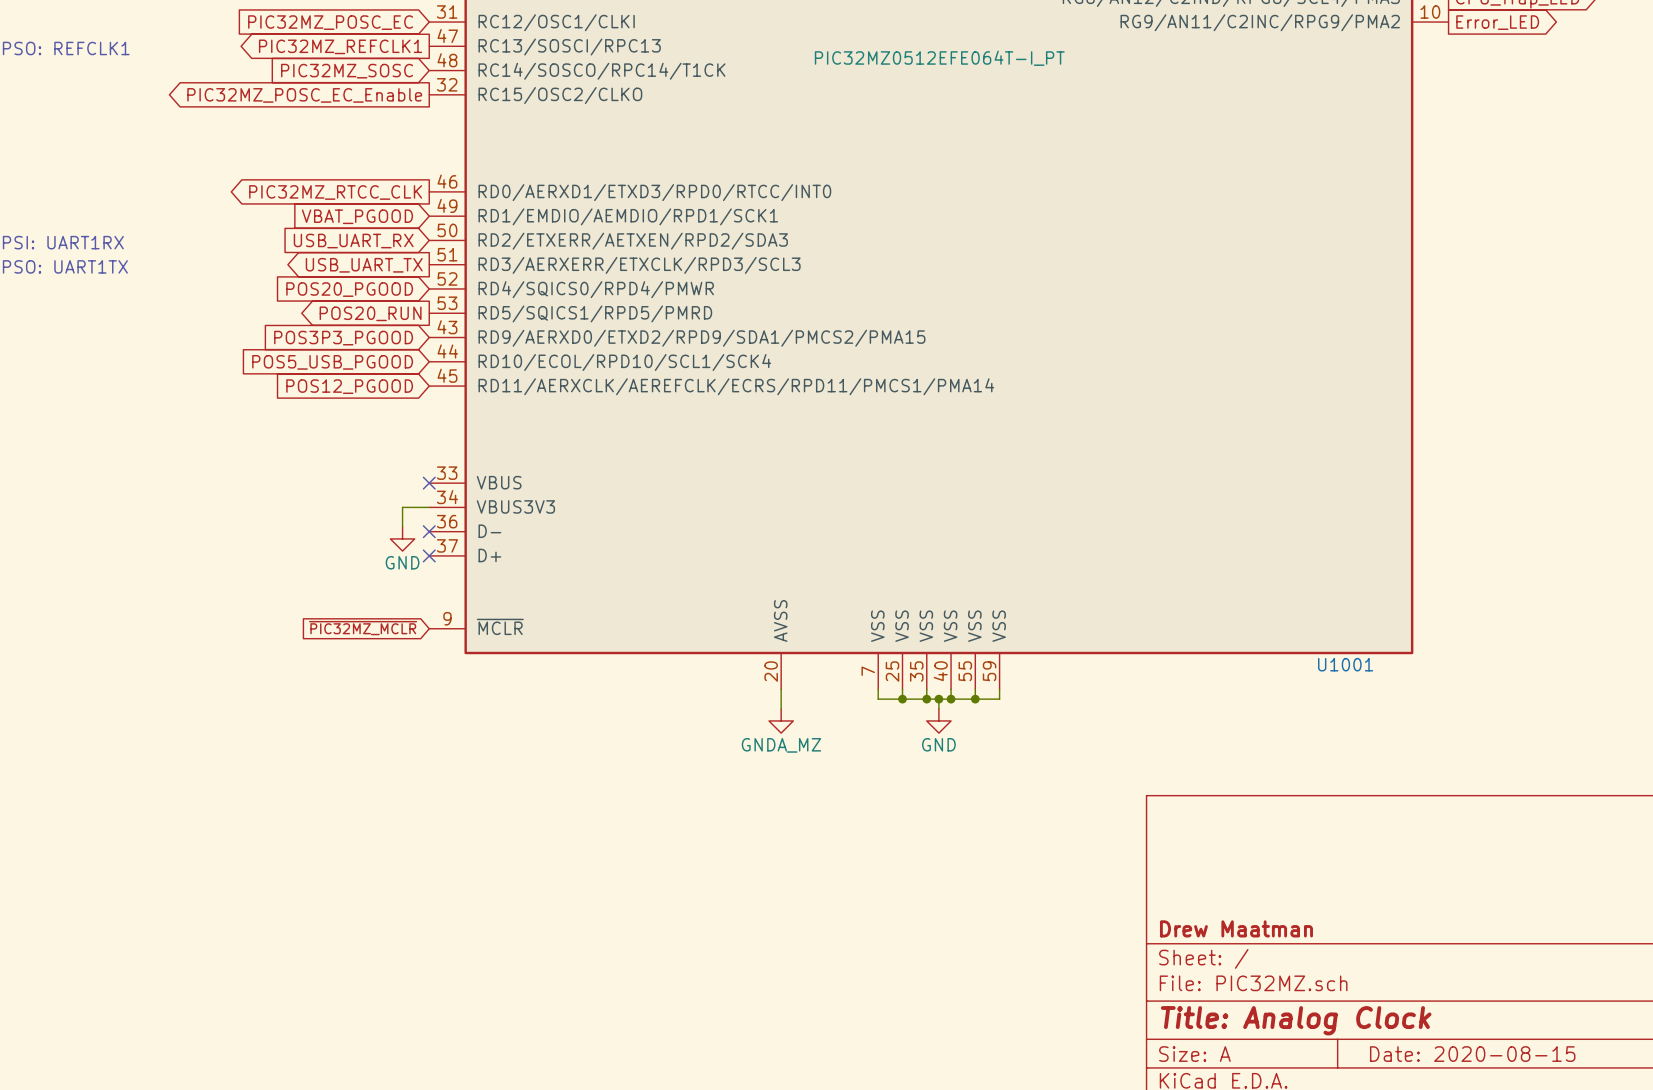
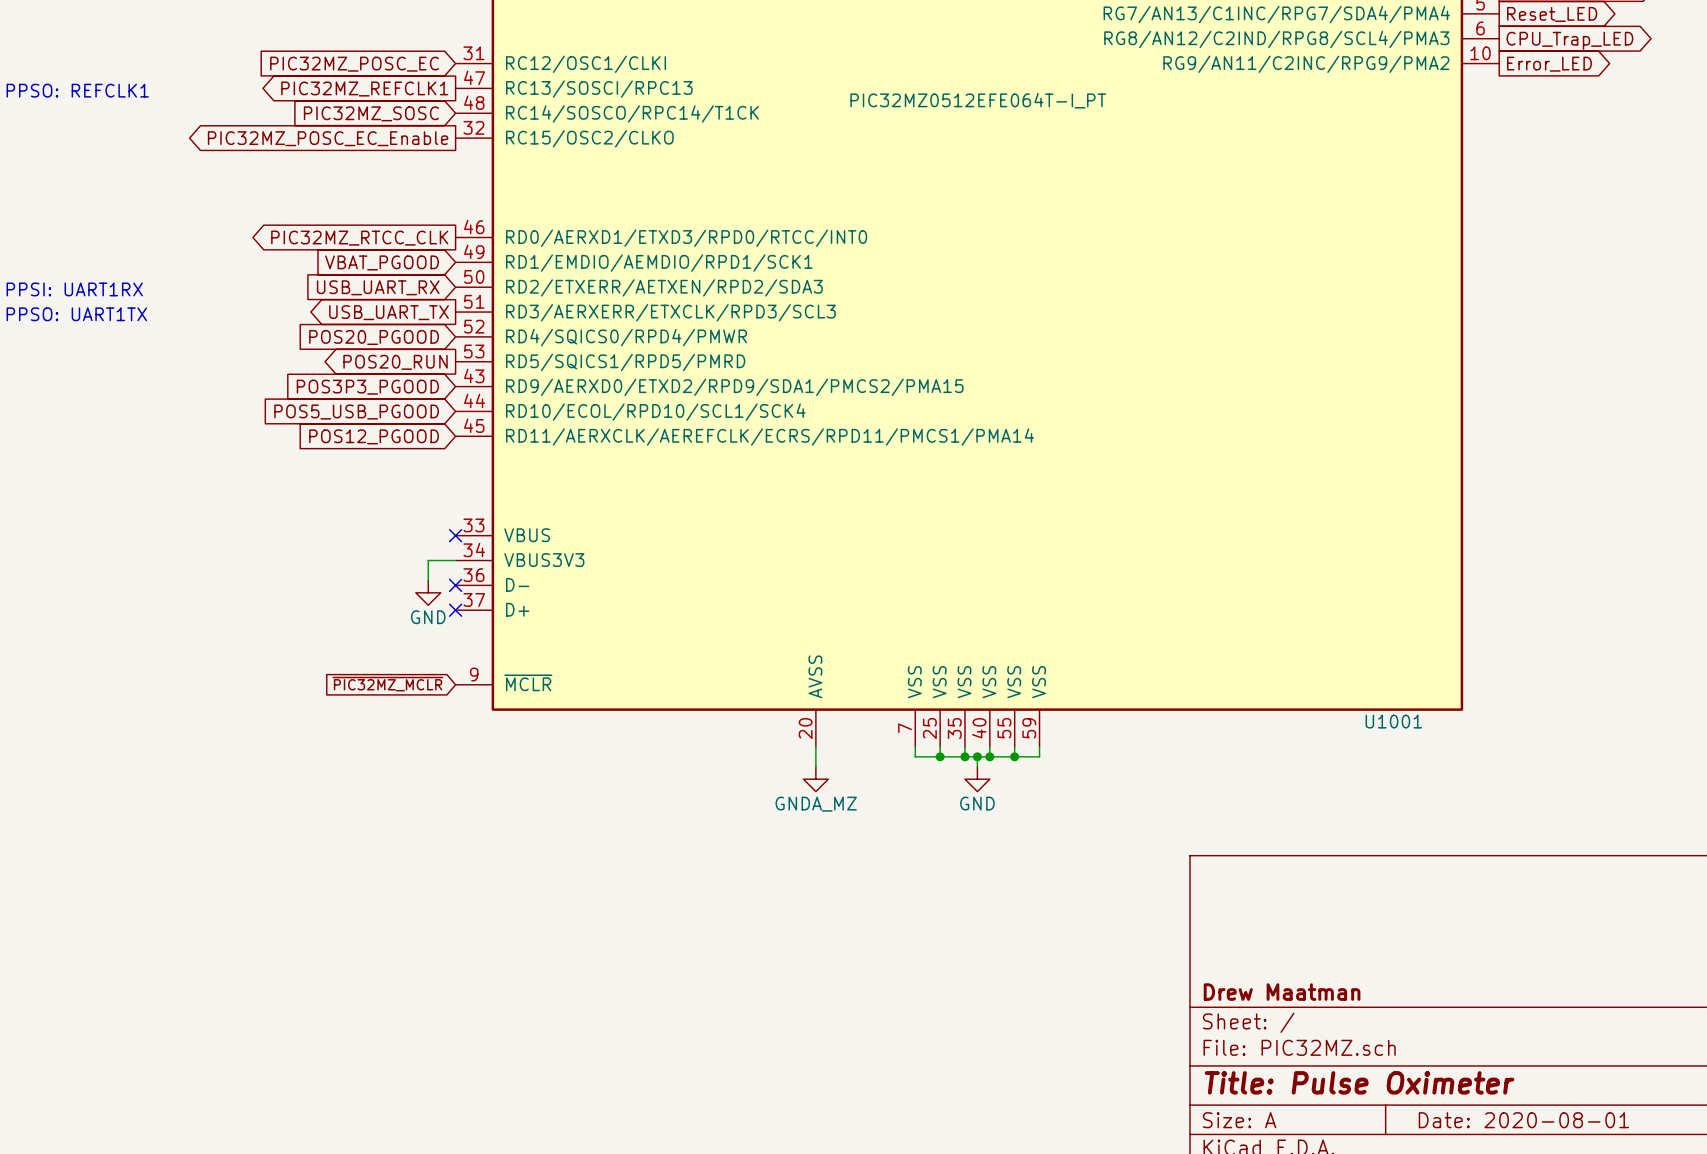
title block: Title: Analog Clock (1296, 1020) -> Title: Pulse Oximeter (1359, 1082)
title block: Date: 2020-08-15 (1472, 1054) -> Date: 2020-08-01 (1523, 1120)

